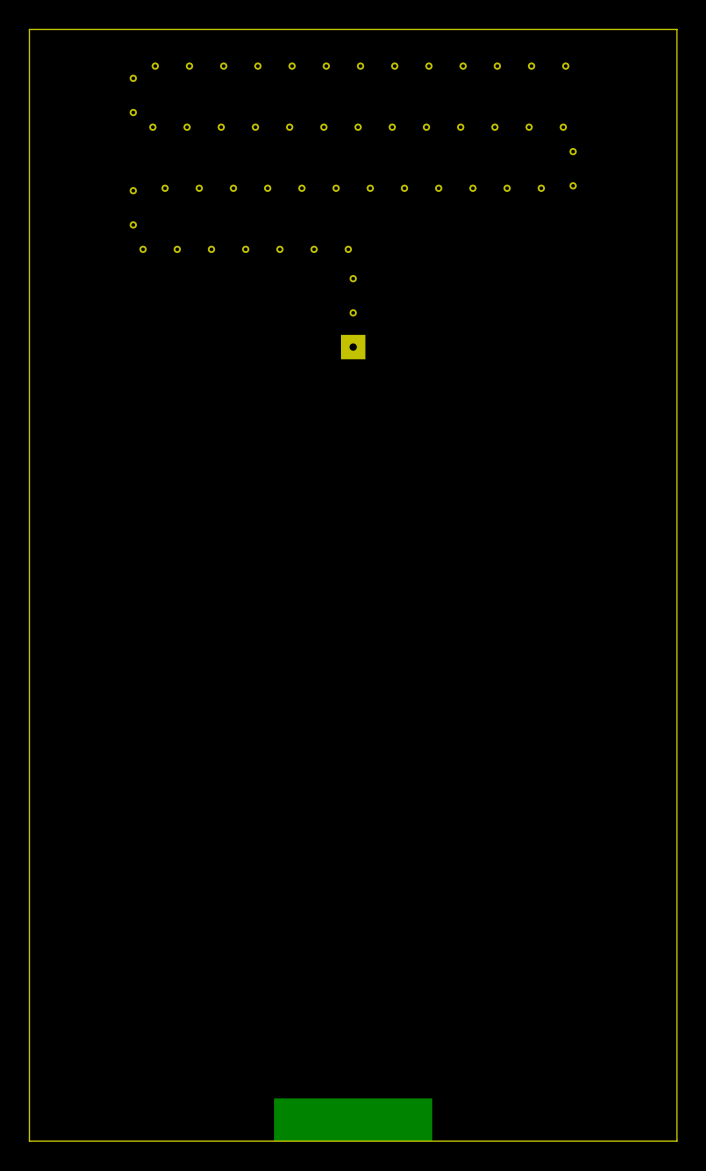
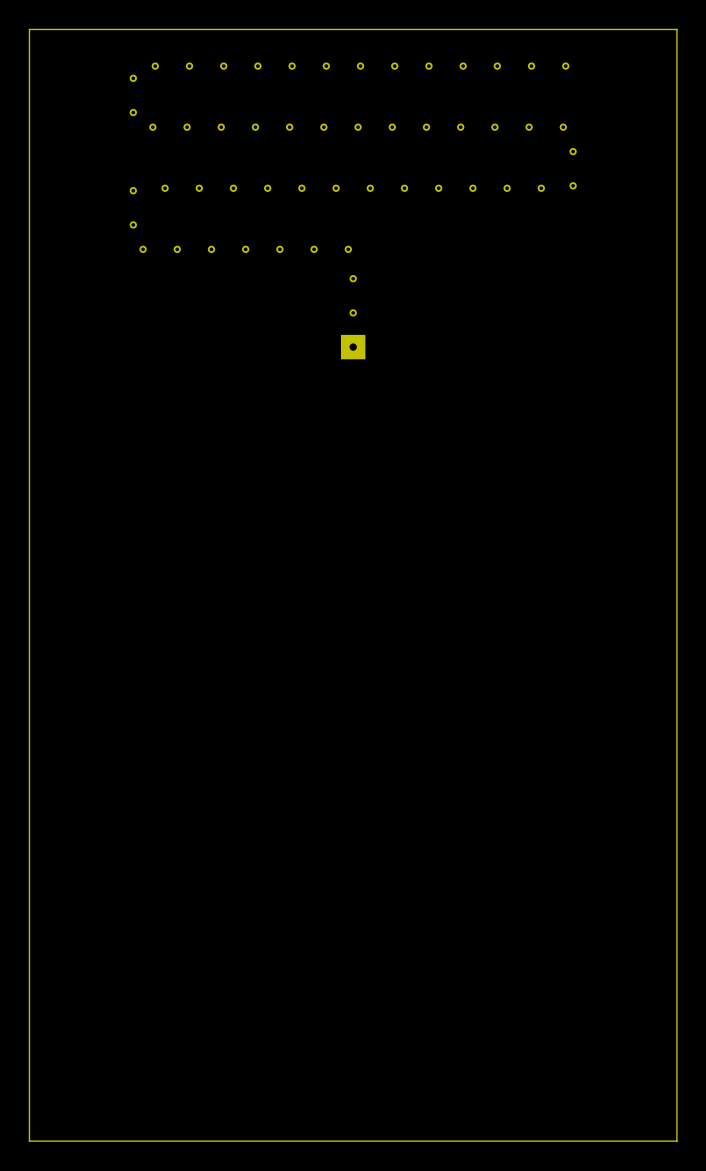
part: (353, 1119) -> none

